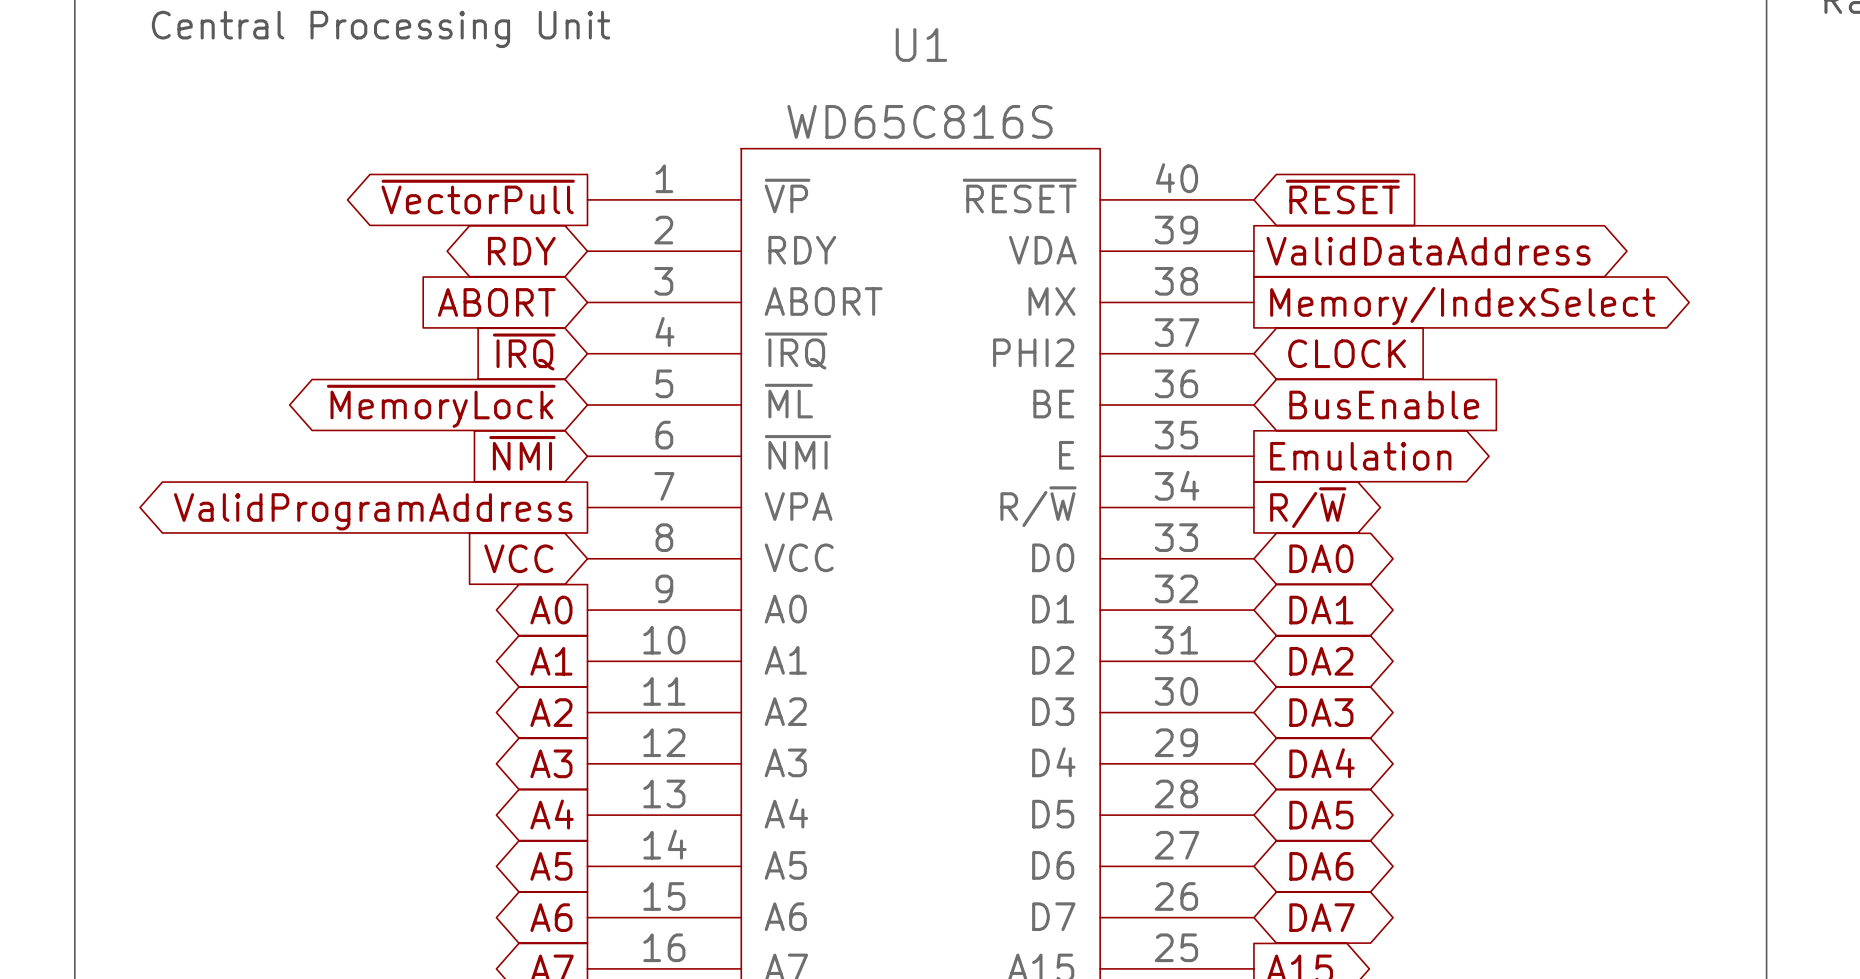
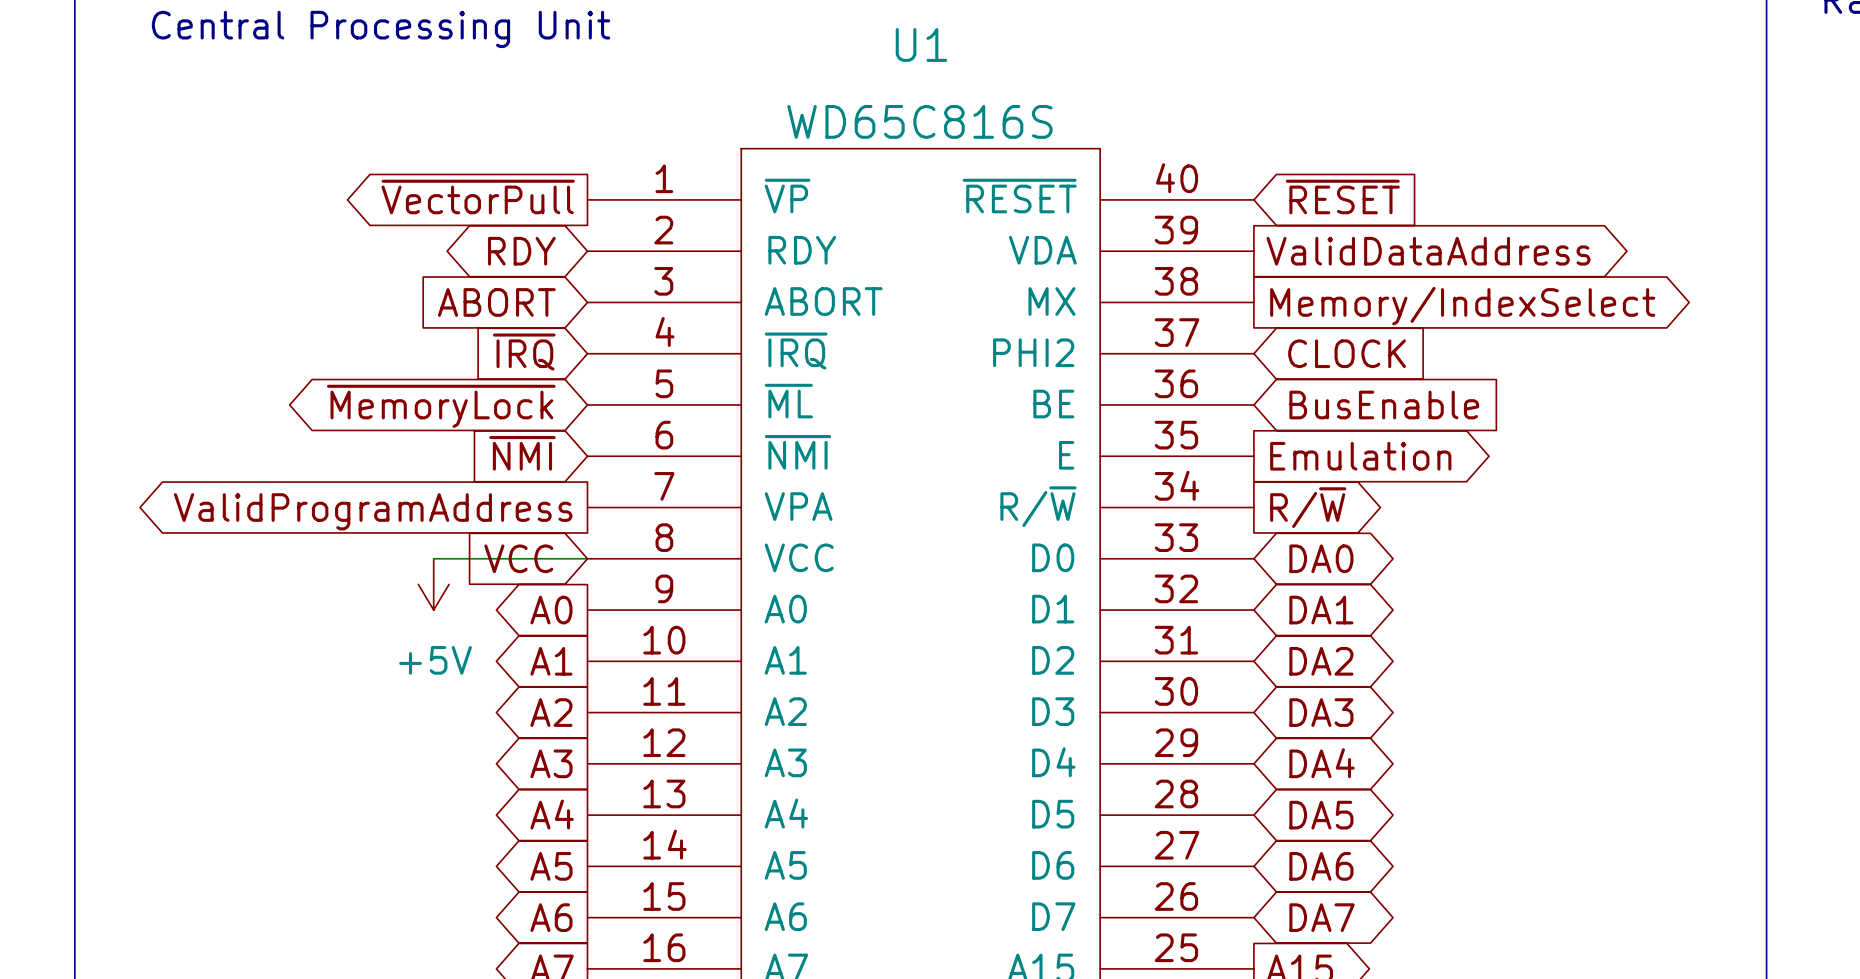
wire: none -> (433, 558) (587, 558)
power symbol: none -> +5V (433, 584)

